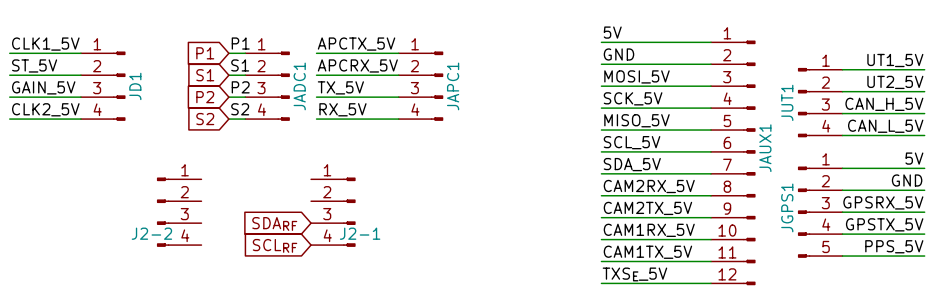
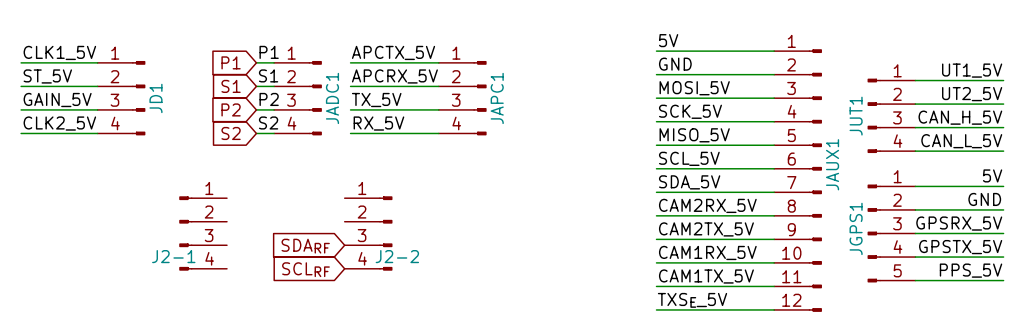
J2-2 name: J2-2 (151, 233) -> J2-1 (173, 256)
J2-1 name: J2-1 (360, 233) -> J2-2 (397, 256)

